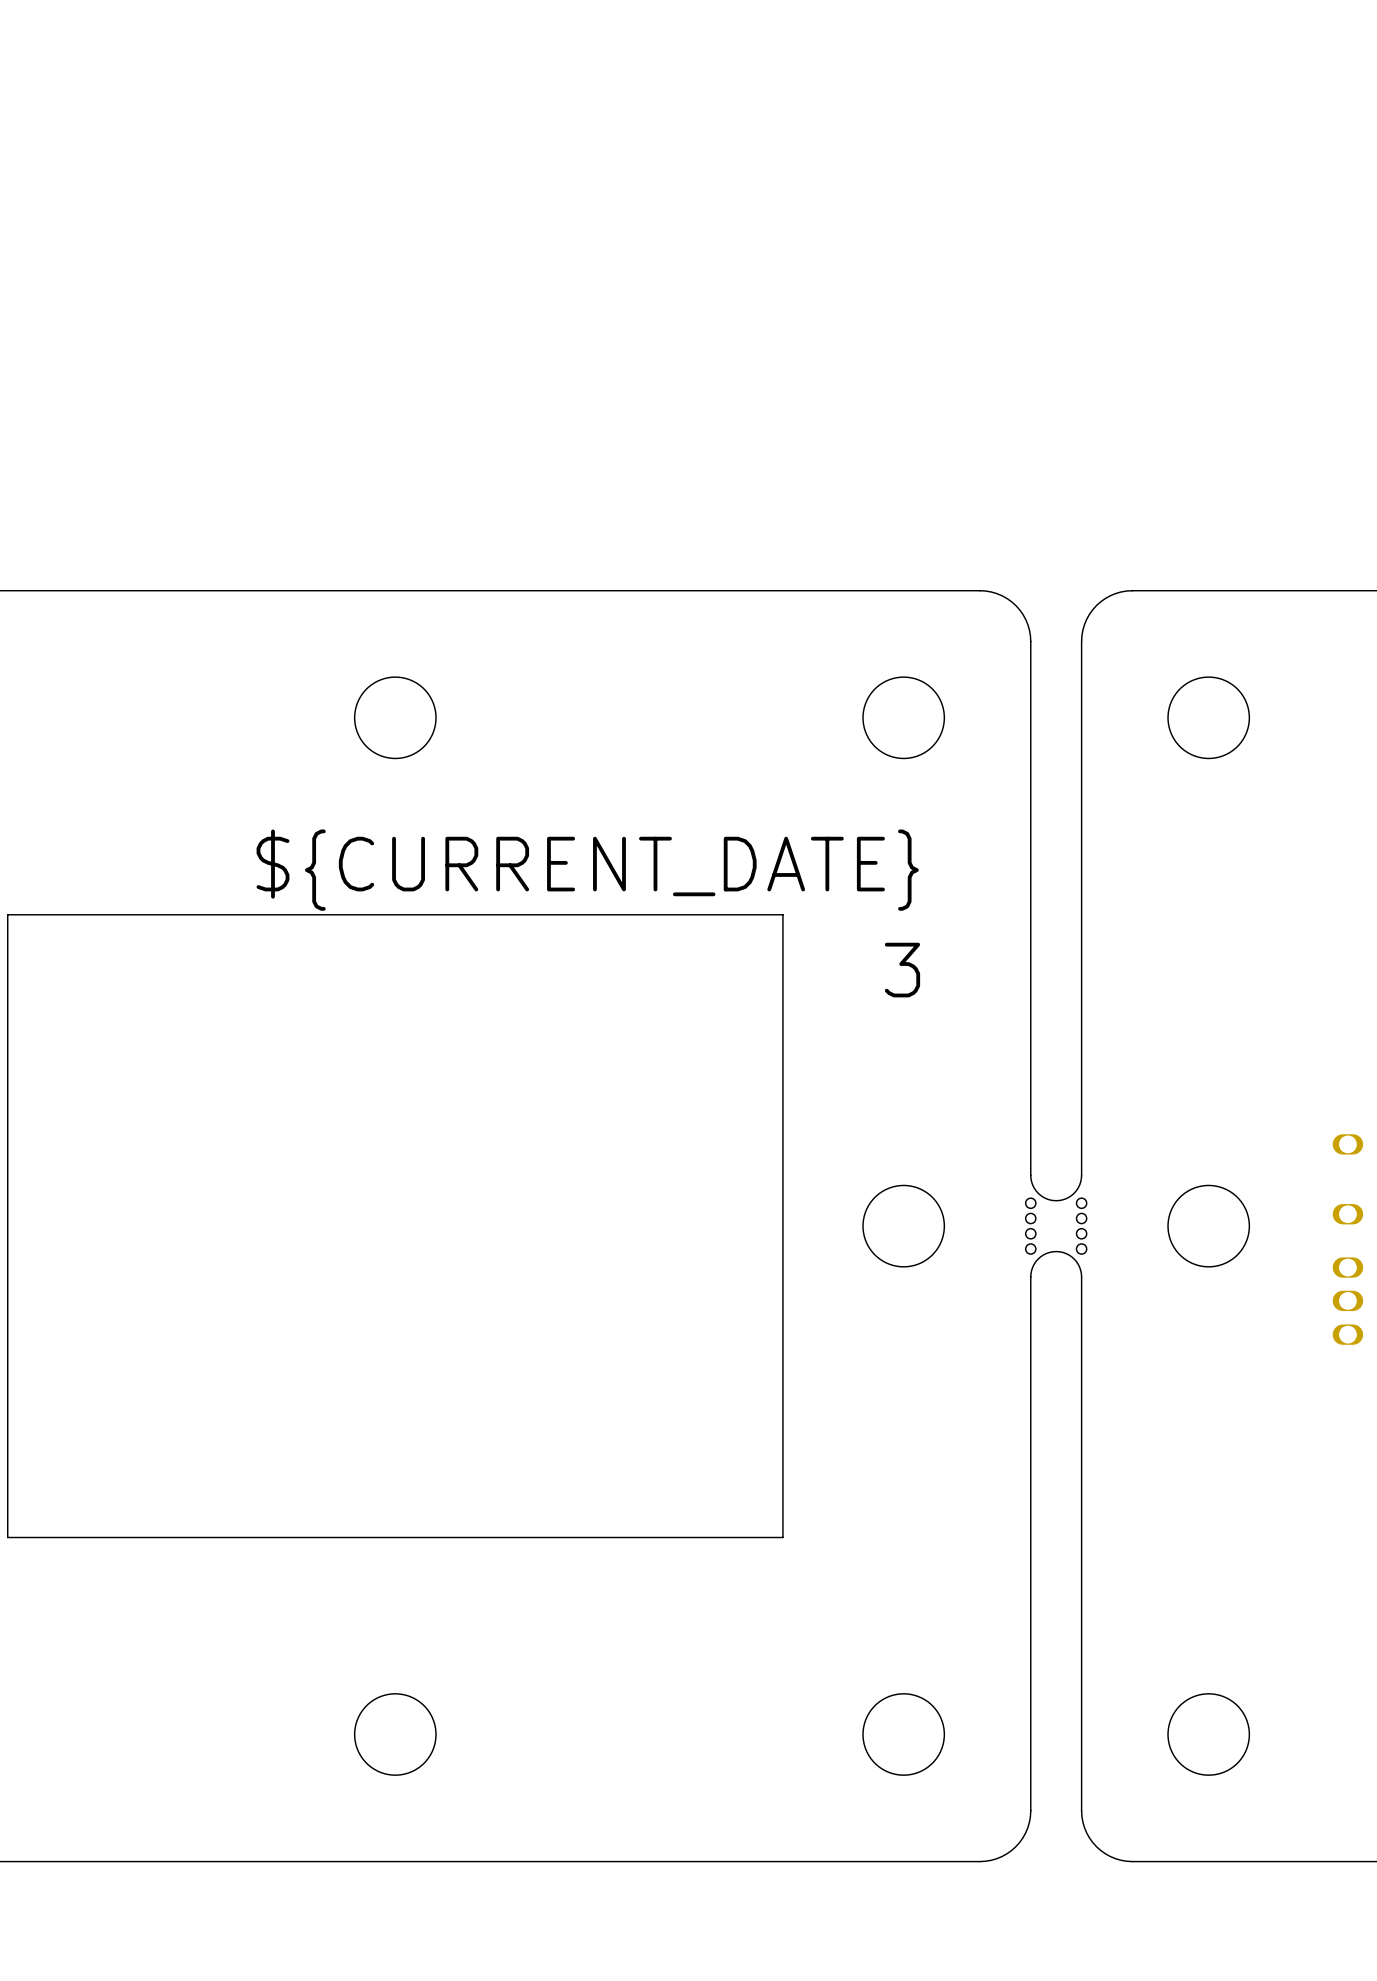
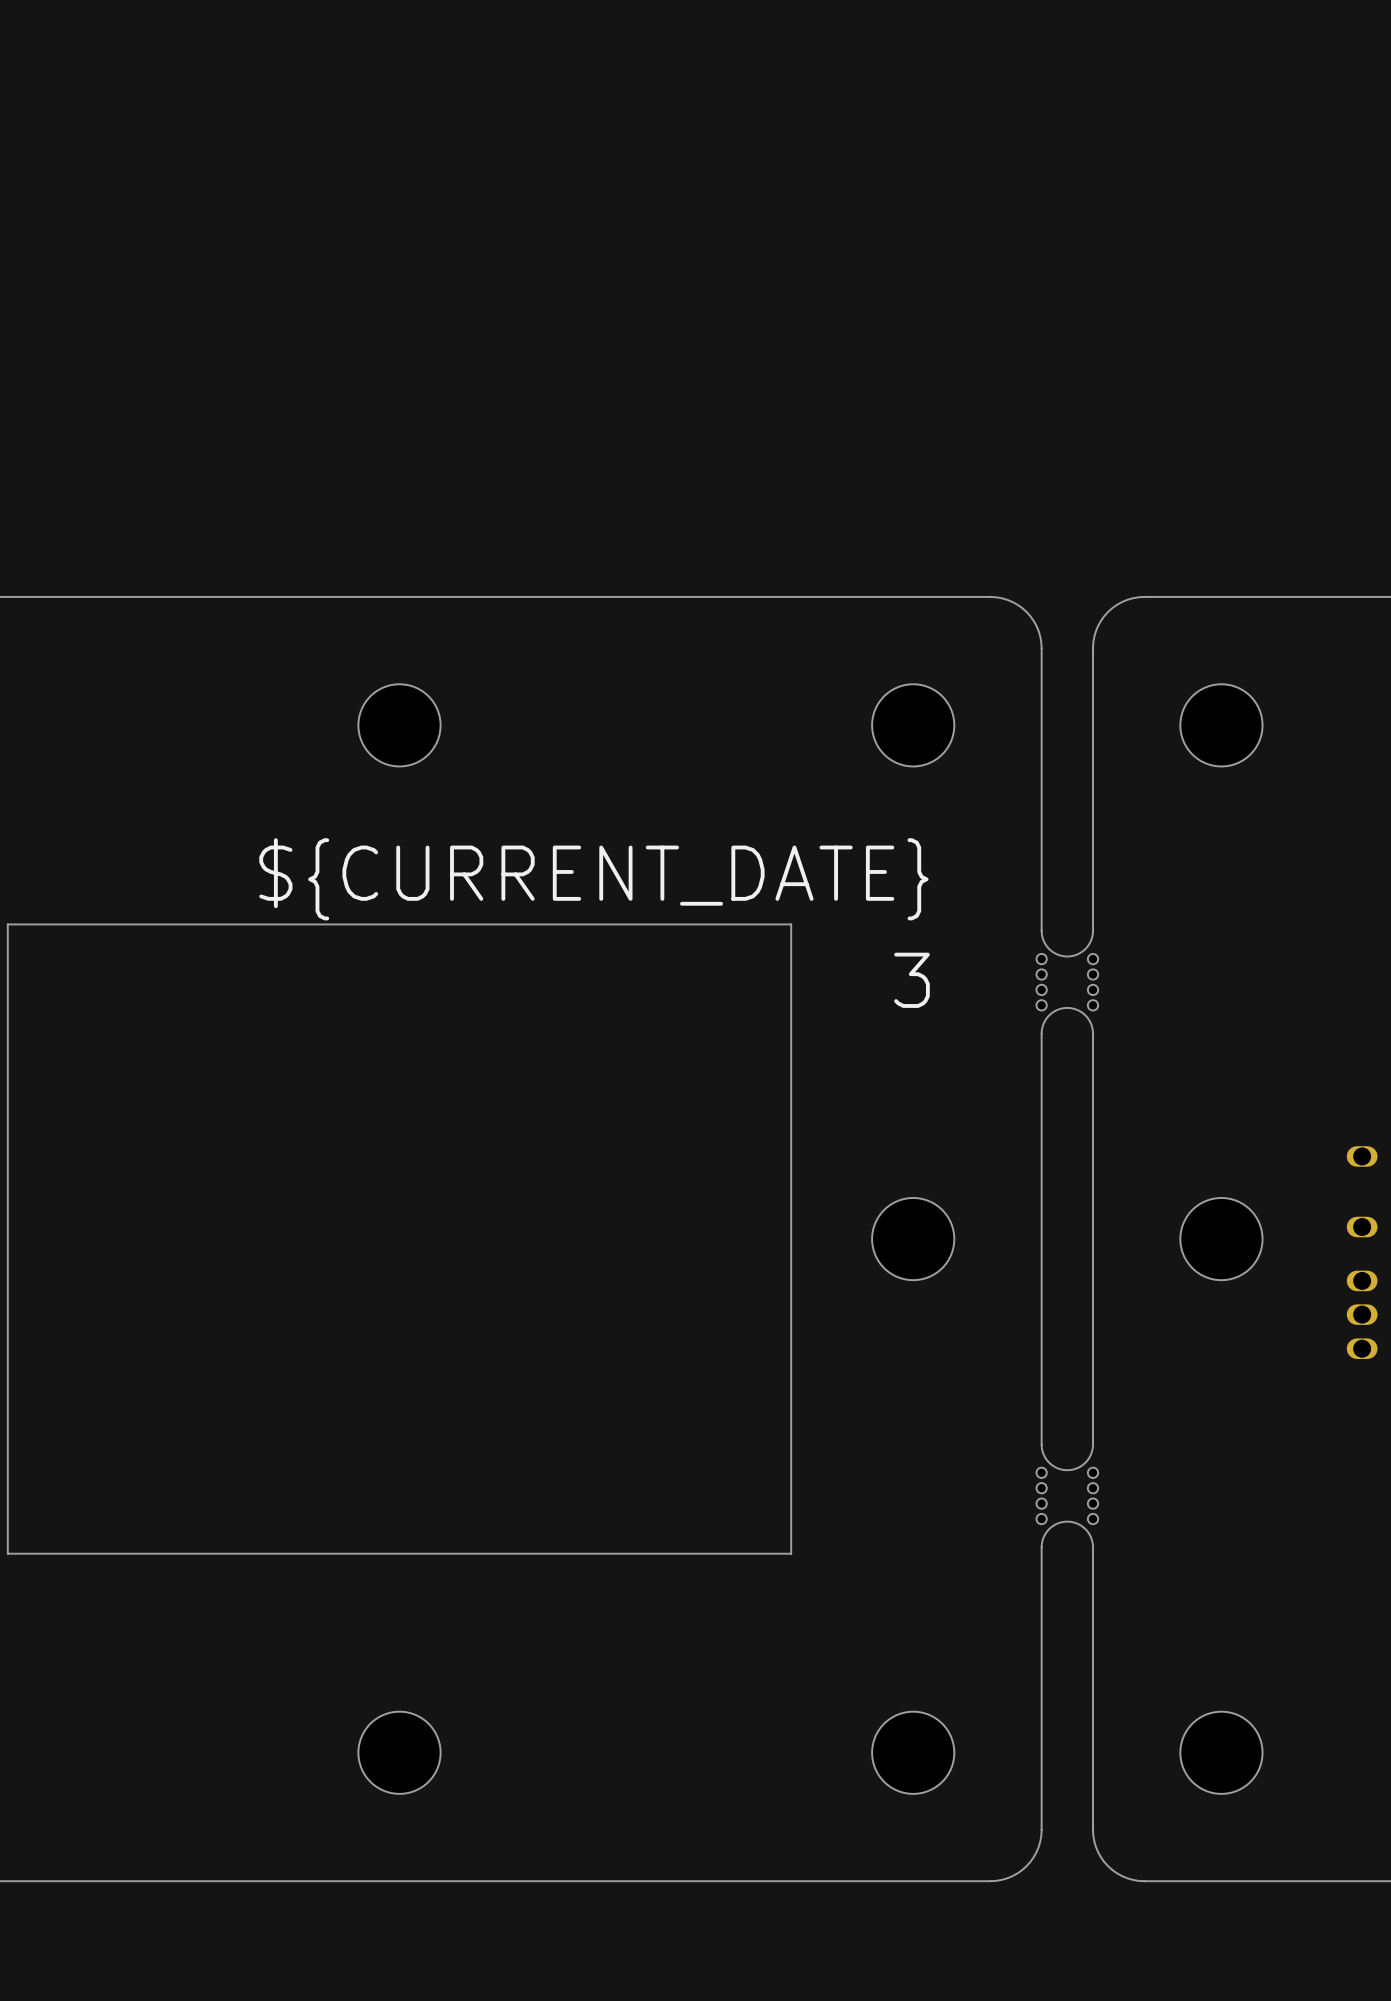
board edge: (1030, 921) (1030, 1022) -> (1041, 1187) (1041, 1290)
board edge: (1081, 921) (1081, 1022) -> (1093, 1187) (1093, 1290)
part: none -> (1067, 982)
part: (1056, 1226) -> none
board edge: (1030, 1429) (1030, 1531) -> none
board edge: (1081, 1429) (1081, 1531) -> none
part: none -> (1067, 1495)

